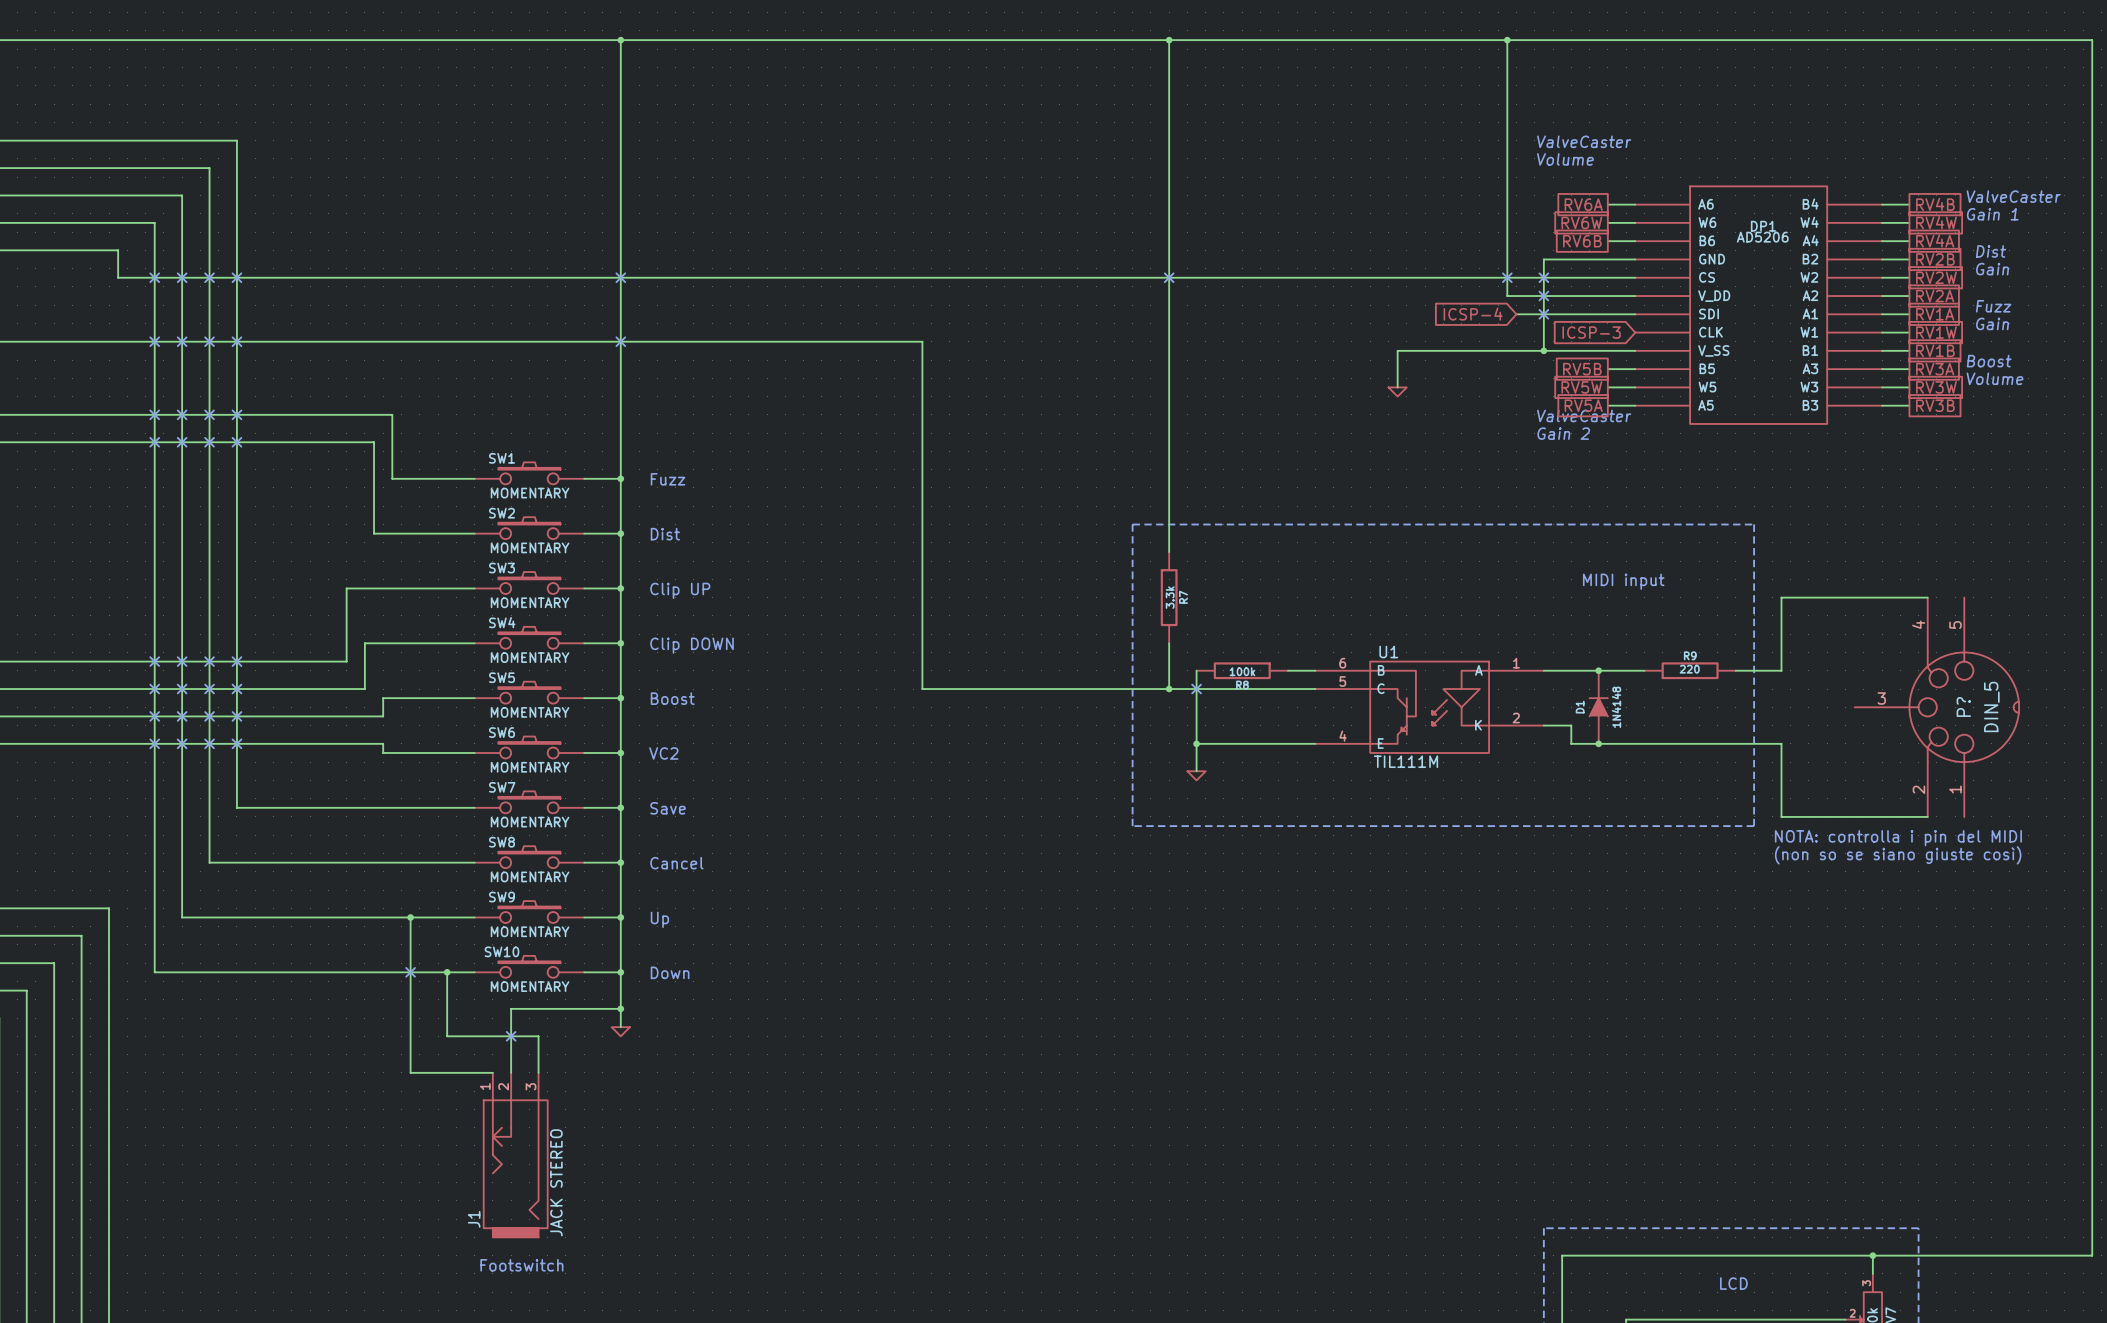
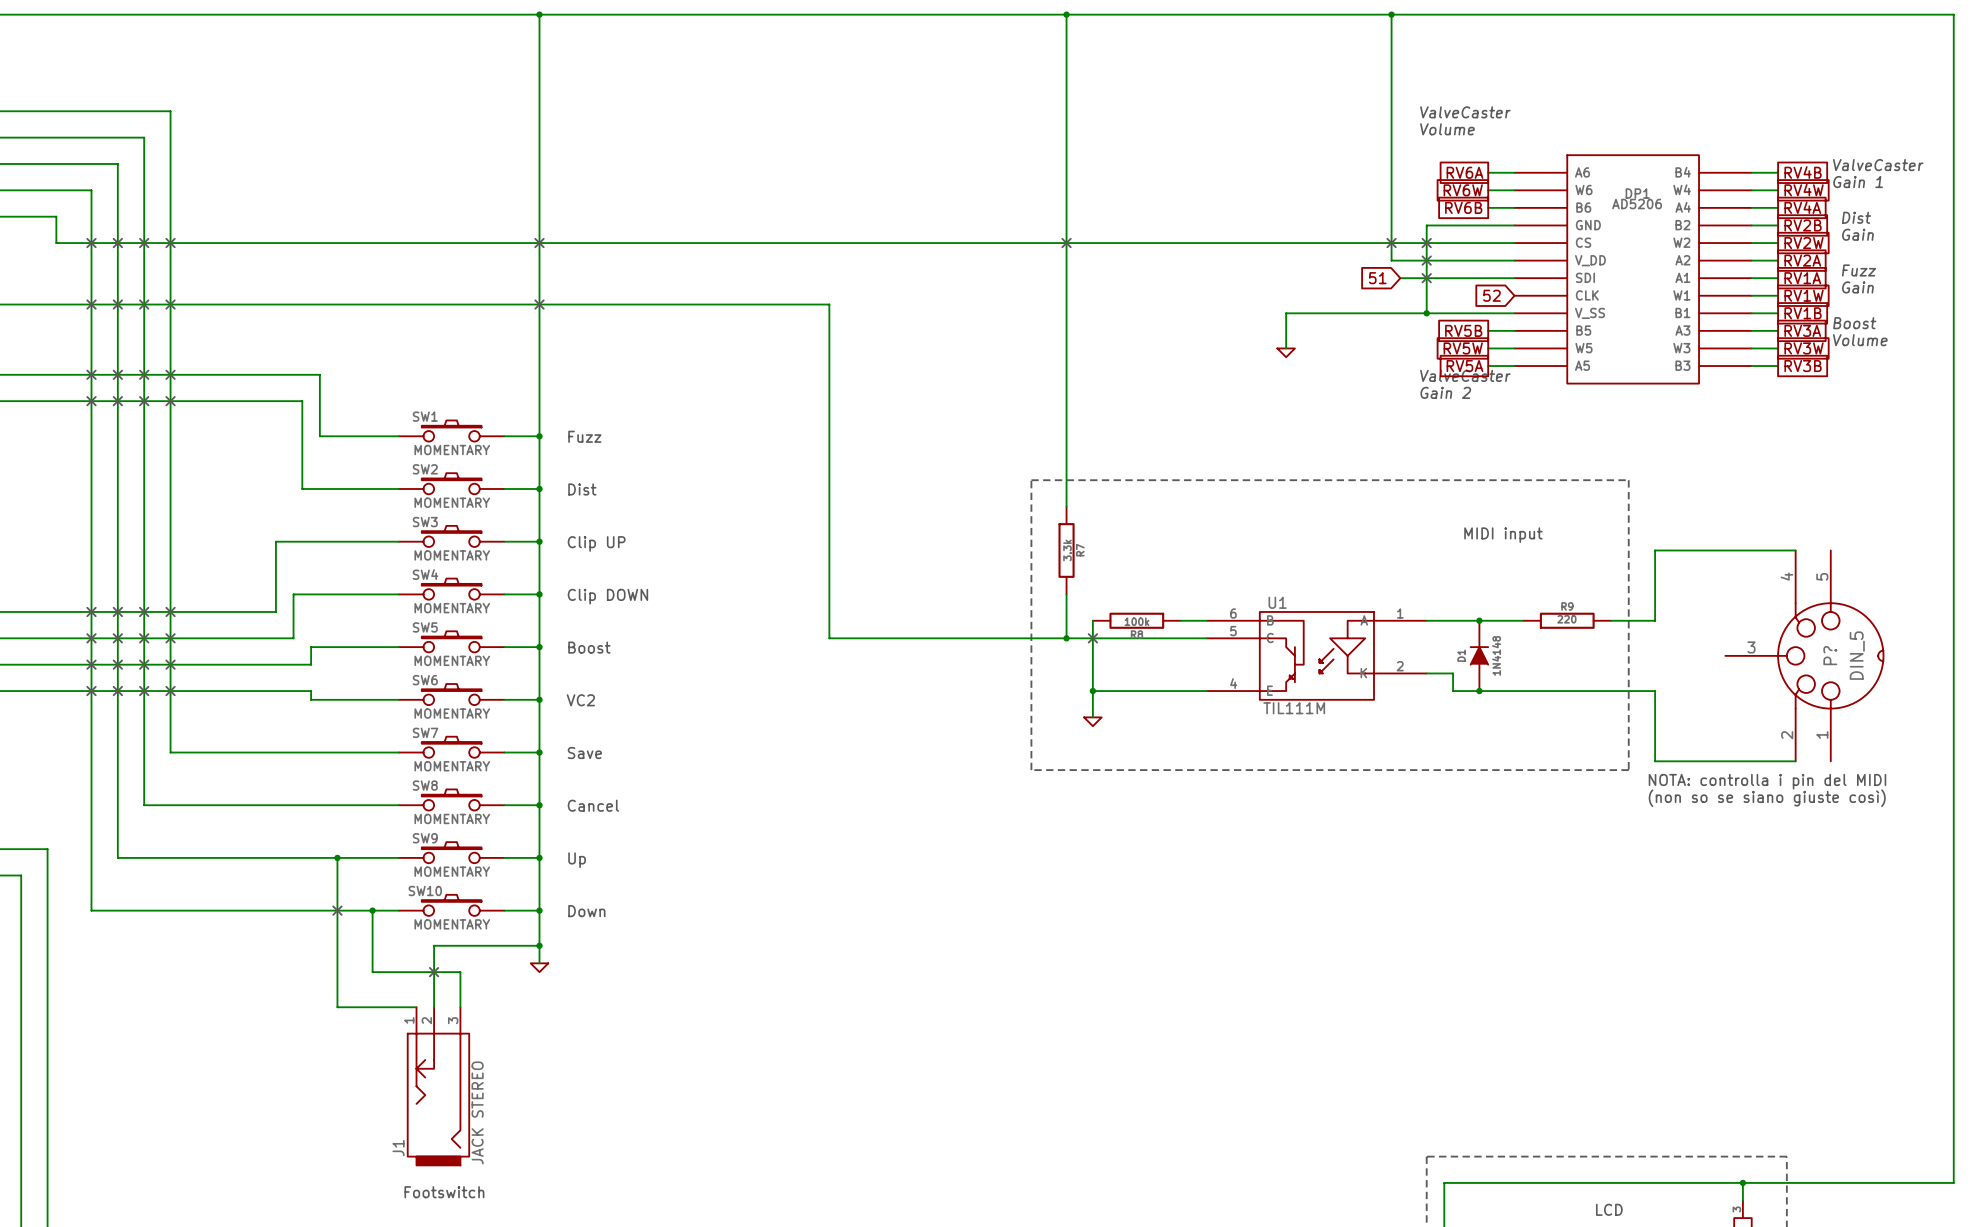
global label: ICSP-4 (1473, 314) -> 51 (1377, 278)
global label: ICSP-3 (1591, 332) -> 52 (1491, 295)

